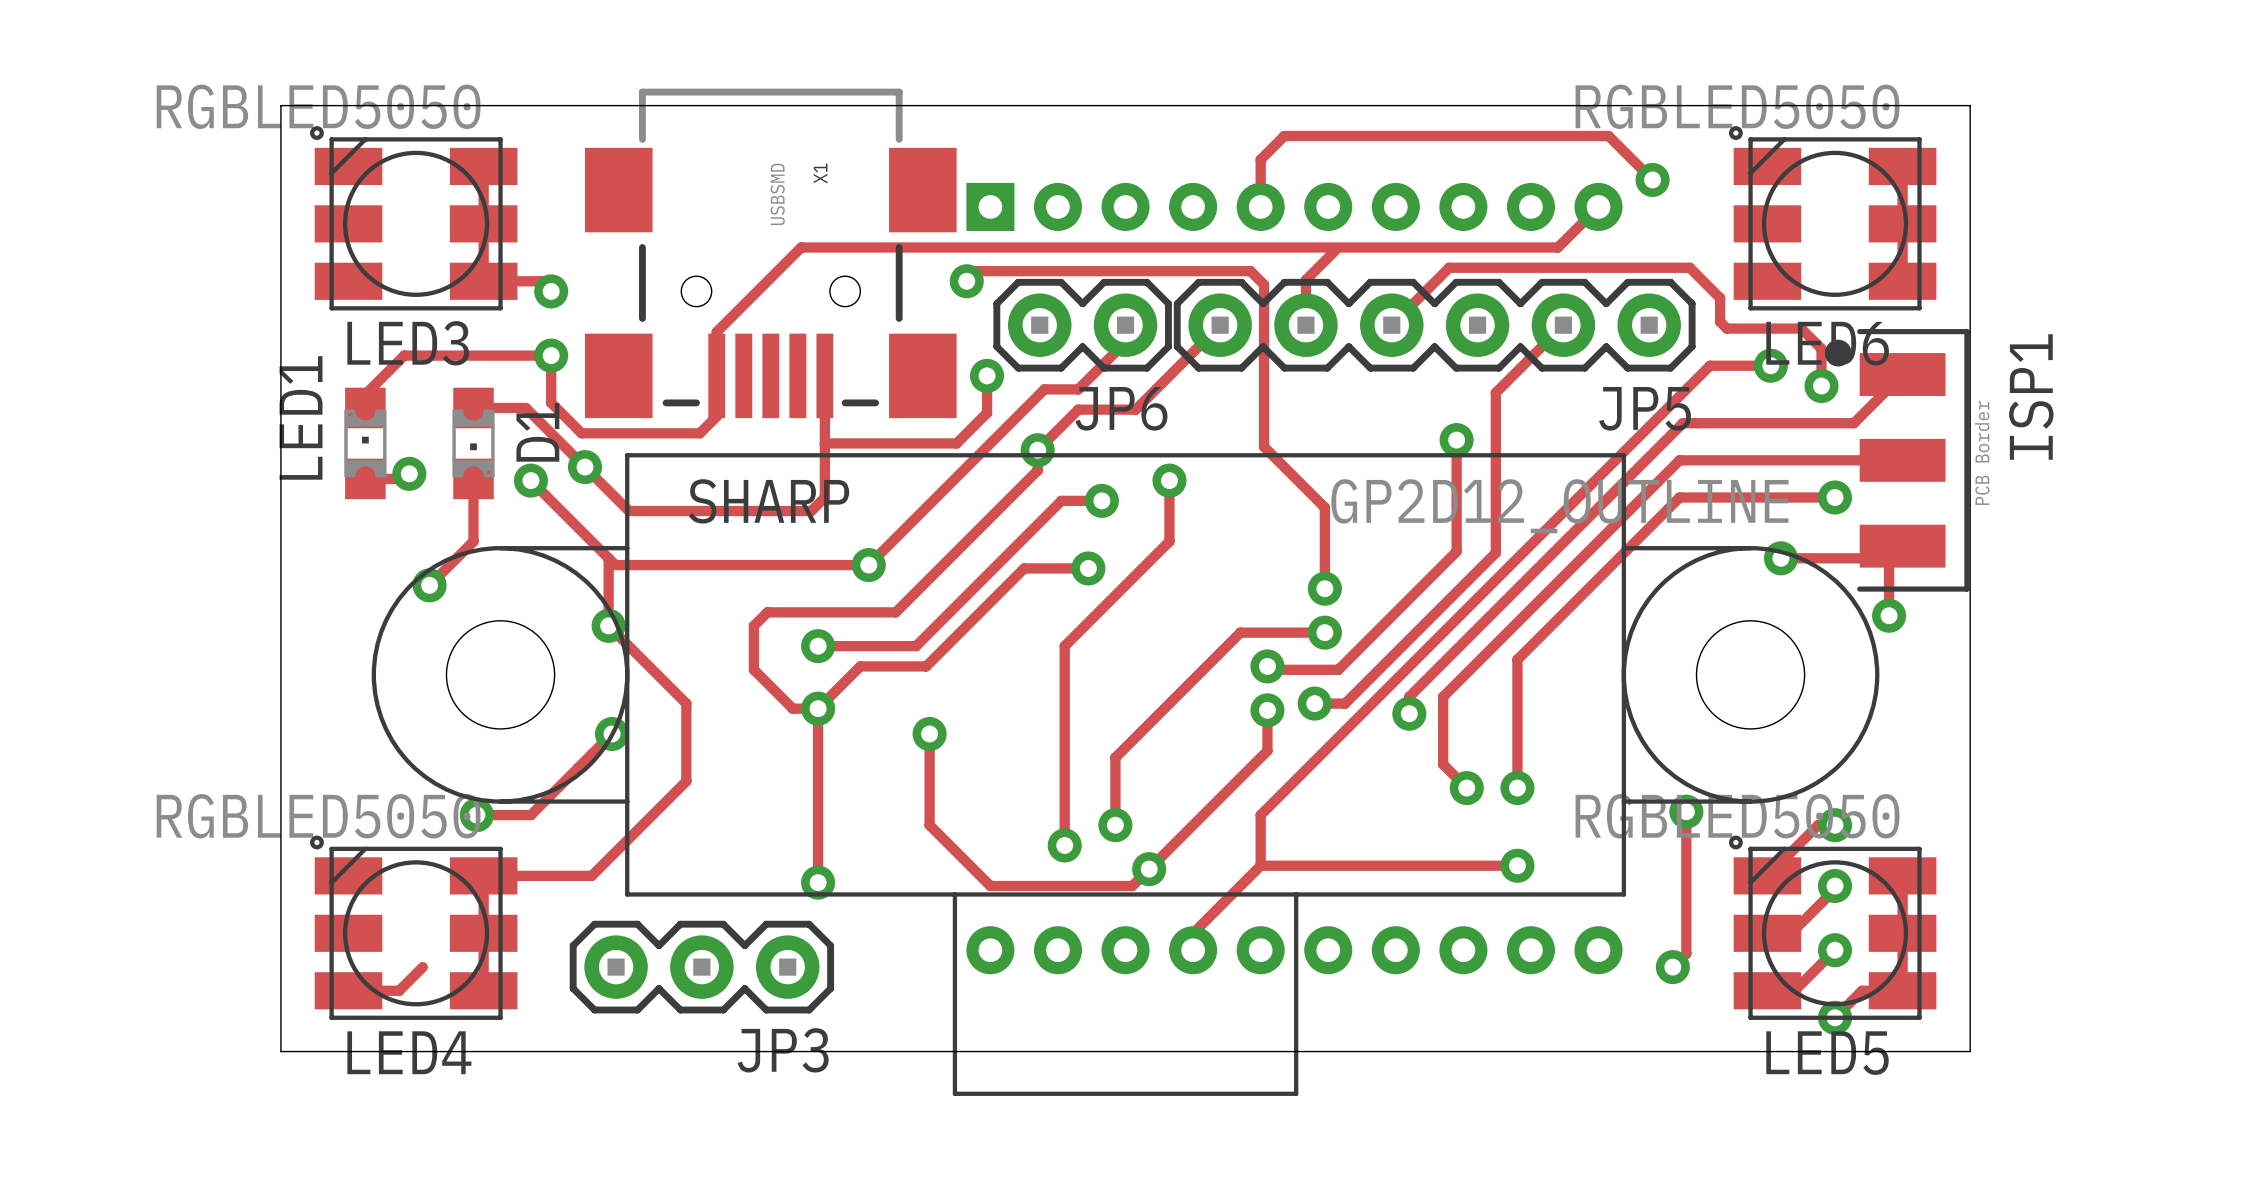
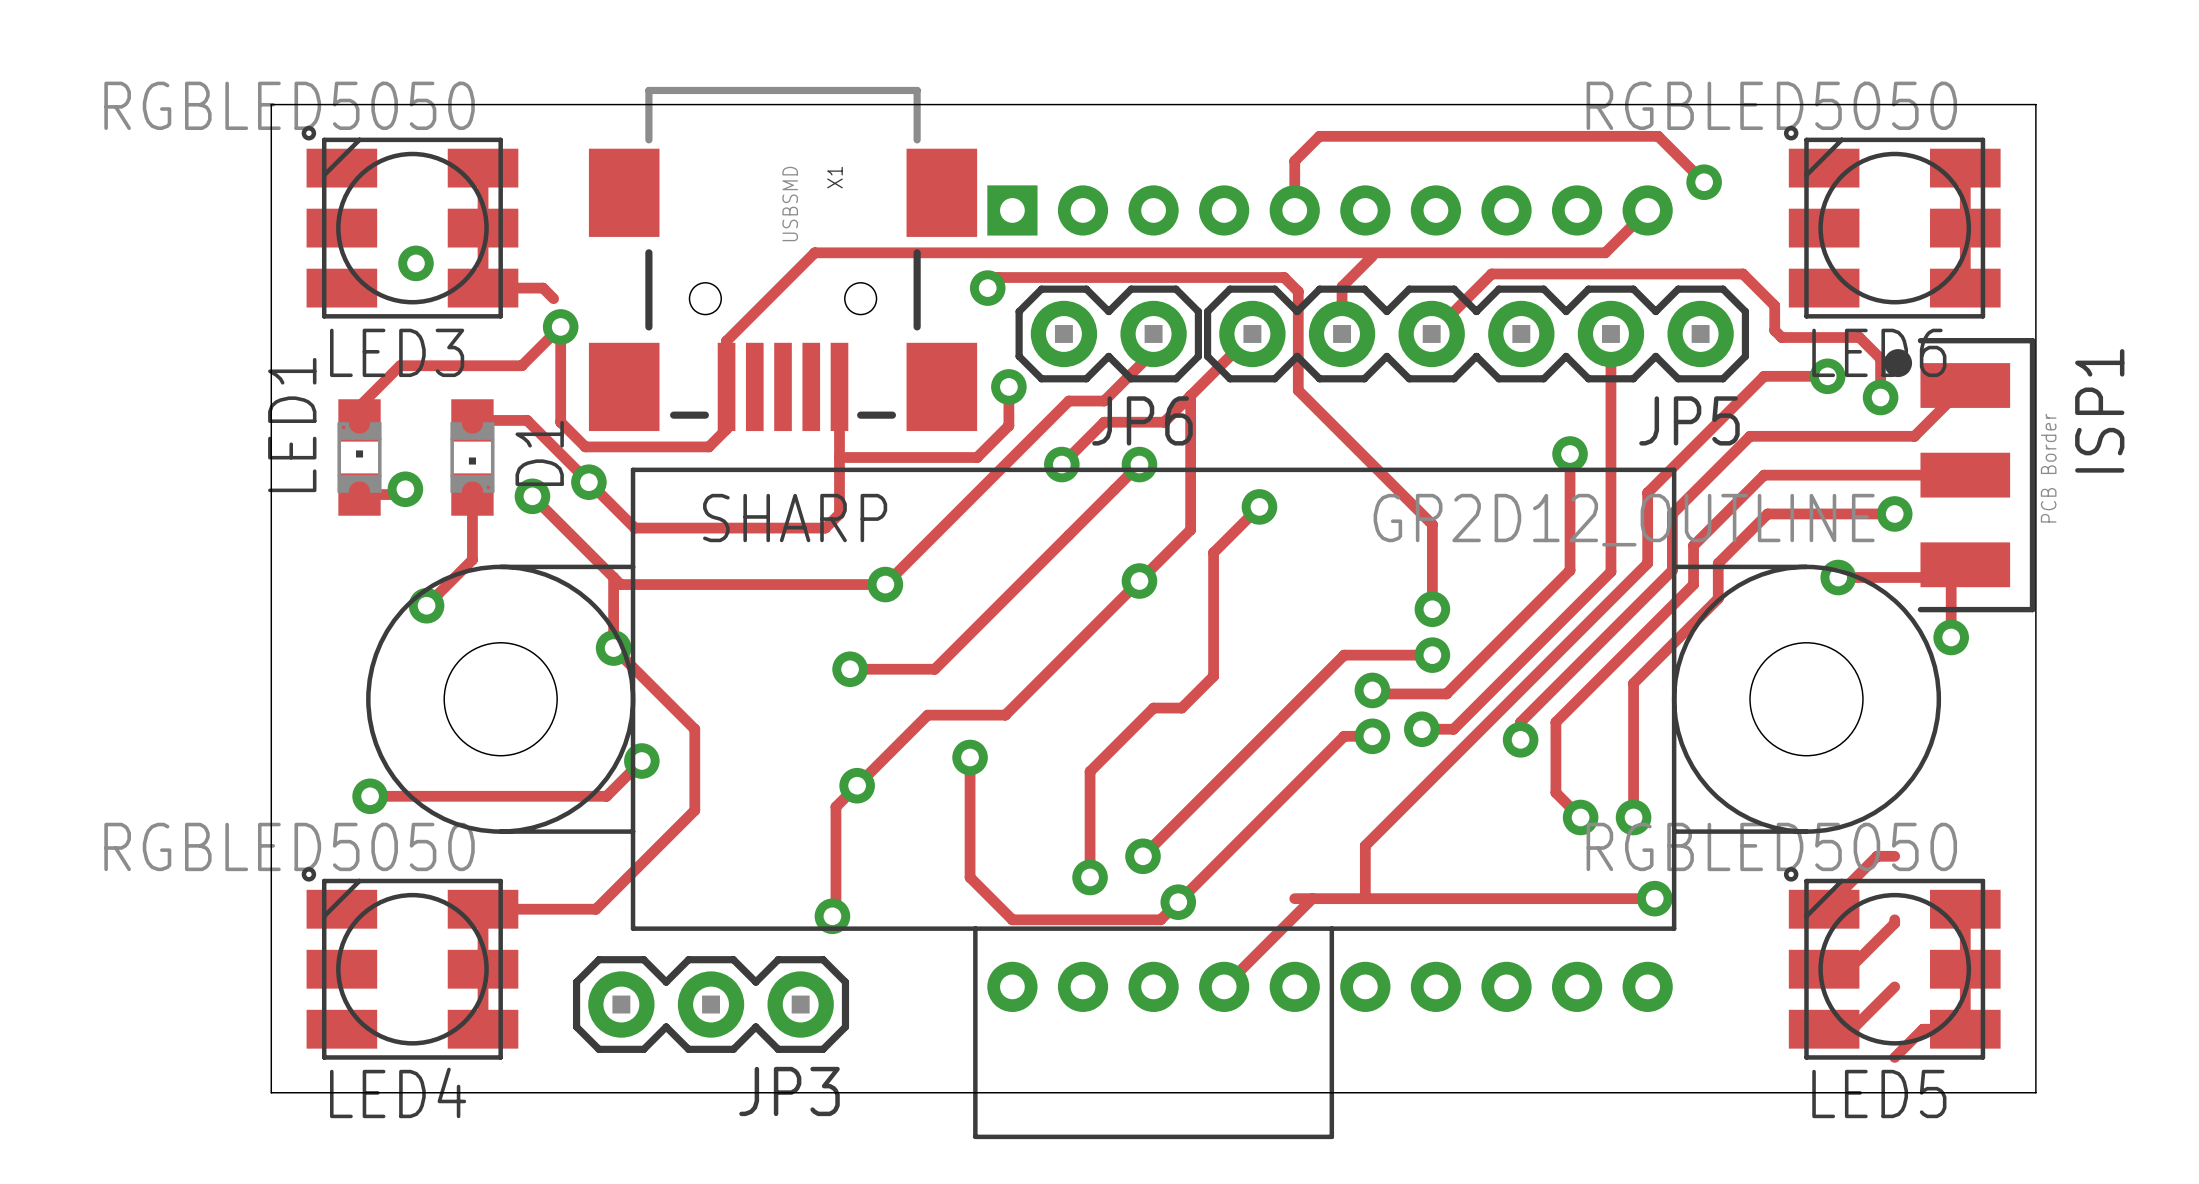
via: none -> (415, 263)
via position: (551, 291) -> (560, 326)
track: (1563, 325) (1495, 392) (1495, 552) (1345, 703) (1314, 703) -> (1610, 333) (1610, 571) (1453, 729) (1421, 729)
track: (520, 355) (551, 355) (551, 402) (557, 409) -> (521, 365) (560, 326) (560, 422)
via: (551, 355) -> none
track: (1264, 379) (1264, 446) (1324, 507) (1324, 588) -> (1298, 390) (1432, 524) (1432, 609)
track: none -> (1190, 395) (1190, 529) (1005, 715) (927, 715) (835, 806) (835, 916)
track: (1696, 423) (1682, 423) (1409, 696) (1409, 713) -> (1750, 436) (1672, 513) (1672, 570) (1520, 722) (1520, 739)
track: (1456, 440) (1456, 551) (1338, 669) (1270, 669) (1267, 666) -> none
via position: (1456, 440) -> (1570, 453)
track: (1037, 450) (1037, 470) (895, 612) (767, 612) (753, 625) (753, 669) (792, 708) (818, 708) -> none
via: none -> (1139, 464)
track: (1710, 460) (1679, 460) (1443, 696) (1443, 764) (1466, 788) -> (1764, 475) (1693, 545) (1693, 584) (1555, 722) (1555, 792) (1580, 817)
track: (1598, 477) (1524, 551) -> (1570, 453) (1570, 570)
track: none -> (1647, 492) (1647, 563) (1365, 845) (1365, 898)
track: (1169, 480) (1169, 541) (1064, 646) (1064, 744) -> (1259, 506) (1213, 552) (1213, 676) (1181, 708) (1153, 708) (1090, 771)
via: (1169, 480) -> none
via: none -> (1259, 506)
track: (1713, 497) (1679, 497) (1517, 659) (1517, 788) -> (1767, 513) (1718, 563) (1718, 598) (1633, 683) (1633, 817)
track: (1061, 500) (1101, 500) -> (1086, 517) (1139, 464)
via: (1101, 500) -> none
track: (1088, 568) (1024, 568) (926, 666) (860, 666) (818, 708) -> none
via position: (1088, 568) -> (1139, 581)
via: (1324, 588) -> none
via: none -> (1432, 609)
track: (1307, 632) (1240, 632) (1115, 757) (1115, 825) -> (1344, 655) (1142, 856)
track: none -> (1361, 655) (1432, 655)
via: (1324, 632) -> none
via: none -> (1432, 655)
via position: (818, 646) -> (850, 669)
via: (1267, 666) -> none
track: none -> (1372, 690) (1375, 693) (1446, 693)
via: none -> (1372, 690)
track: (1405, 669) (1260, 815) (1260, 865) (1193, 933) (1193, 950) -> (1312, 898) (1224, 986)
via position: (1314, 703) -> (1372, 736)
track: (818, 708) (818, 882) -> none
via: (818, 708) -> none
track: (1267, 710) (1267, 750) -> (1372, 736) (1344, 736) (1301, 778)
via: (1267, 710) -> none
via position: (1409, 713) -> (1421, 729)
via: none -> (1520, 739)
track: (612, 733) (530, 815) (476, 815) -> none
via position: (612, 733) -> (641, 761)
track: none -> (641, 761) (606, 796) (370, 796)
track: (929, 733) (929, 825) (949, 845) -> (970, 757) (970, 877)
via position: (929, 733) -> (970, 757)
via: none -> (857, 785)
via: none -> (370, 796)
via: (1466, 788) -> none
via position: (1517, 788) -> (1580, 817)
via: none -> (1633, 817)
track: (1686, 811) (1686, 953) (1672, 967) -> none
via: (1686, 811) -> none
via: (476, 815) -> none
via: (1835, 825) -> none
track: none -> (1562, 898) (1654, 898)
via: (1517, 865) -> none
via: none -> (1654, 898)
via: (1835, 886) -> none
via: (1835, 950) -> none
track: (422, 967) (399, 990) (348, 990) -> none
via: (1672, 967) -> none
via: (1835, 1017) -> none

